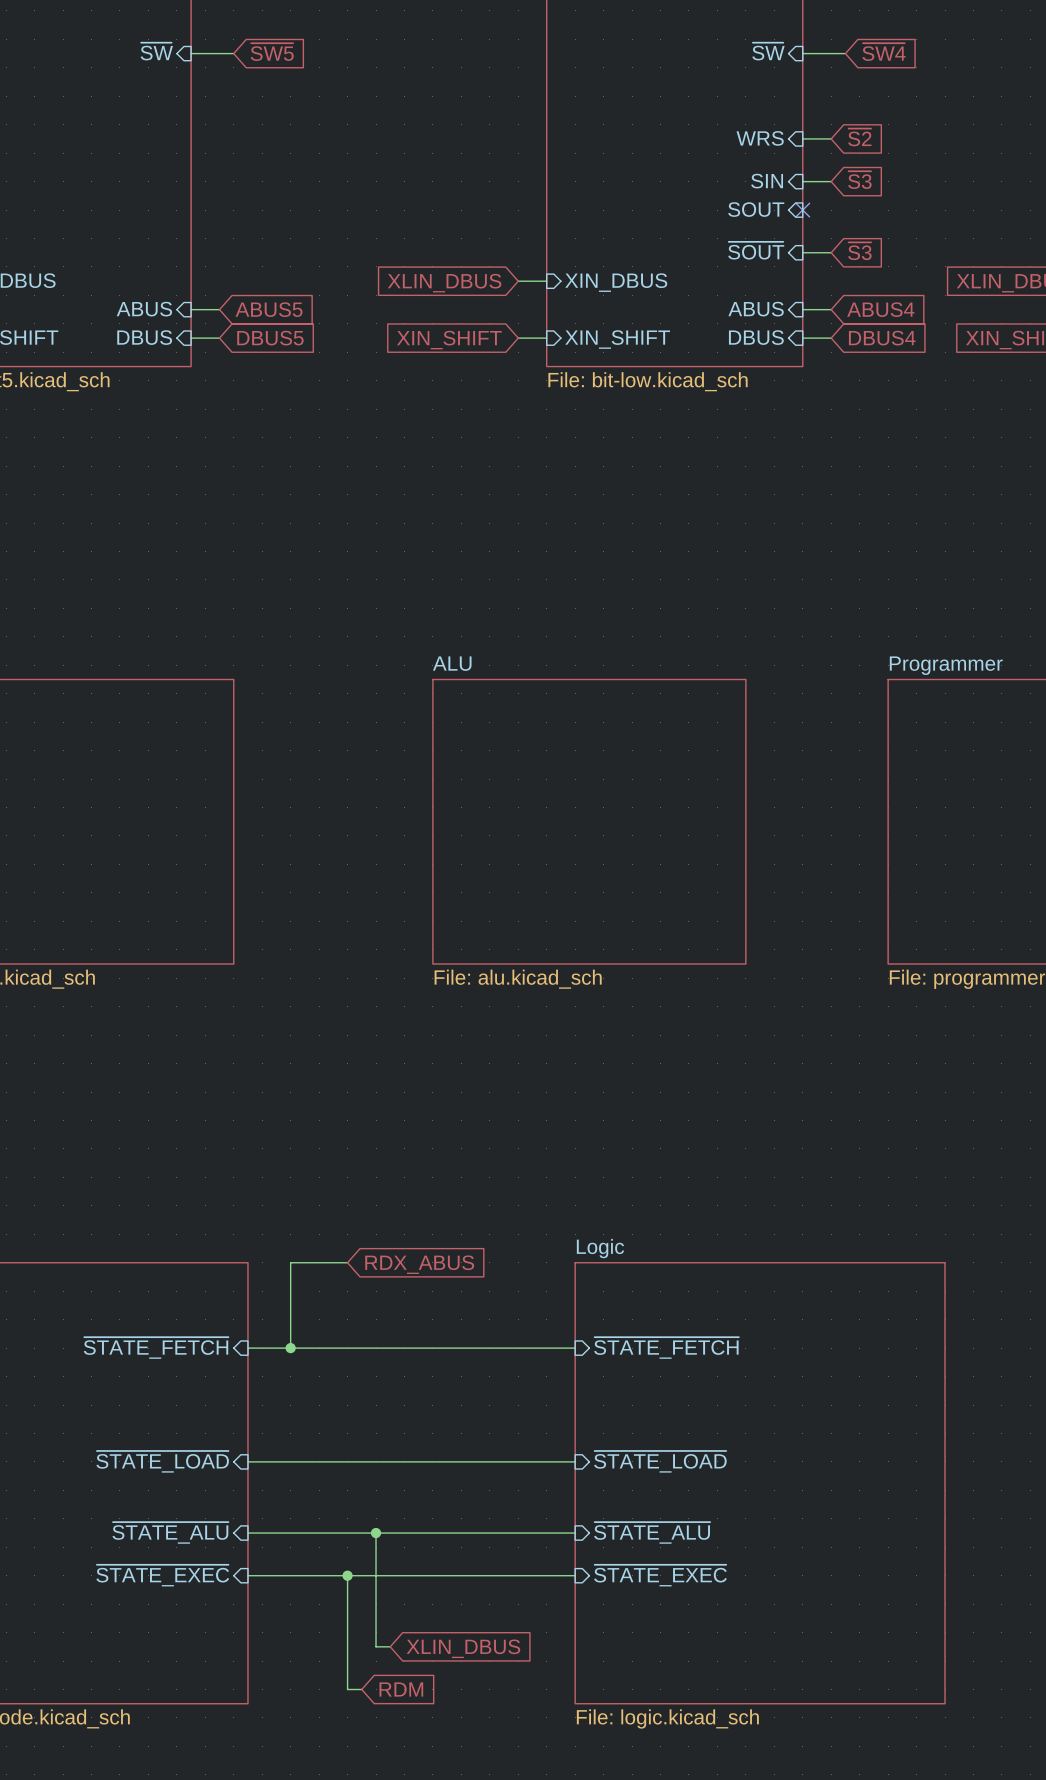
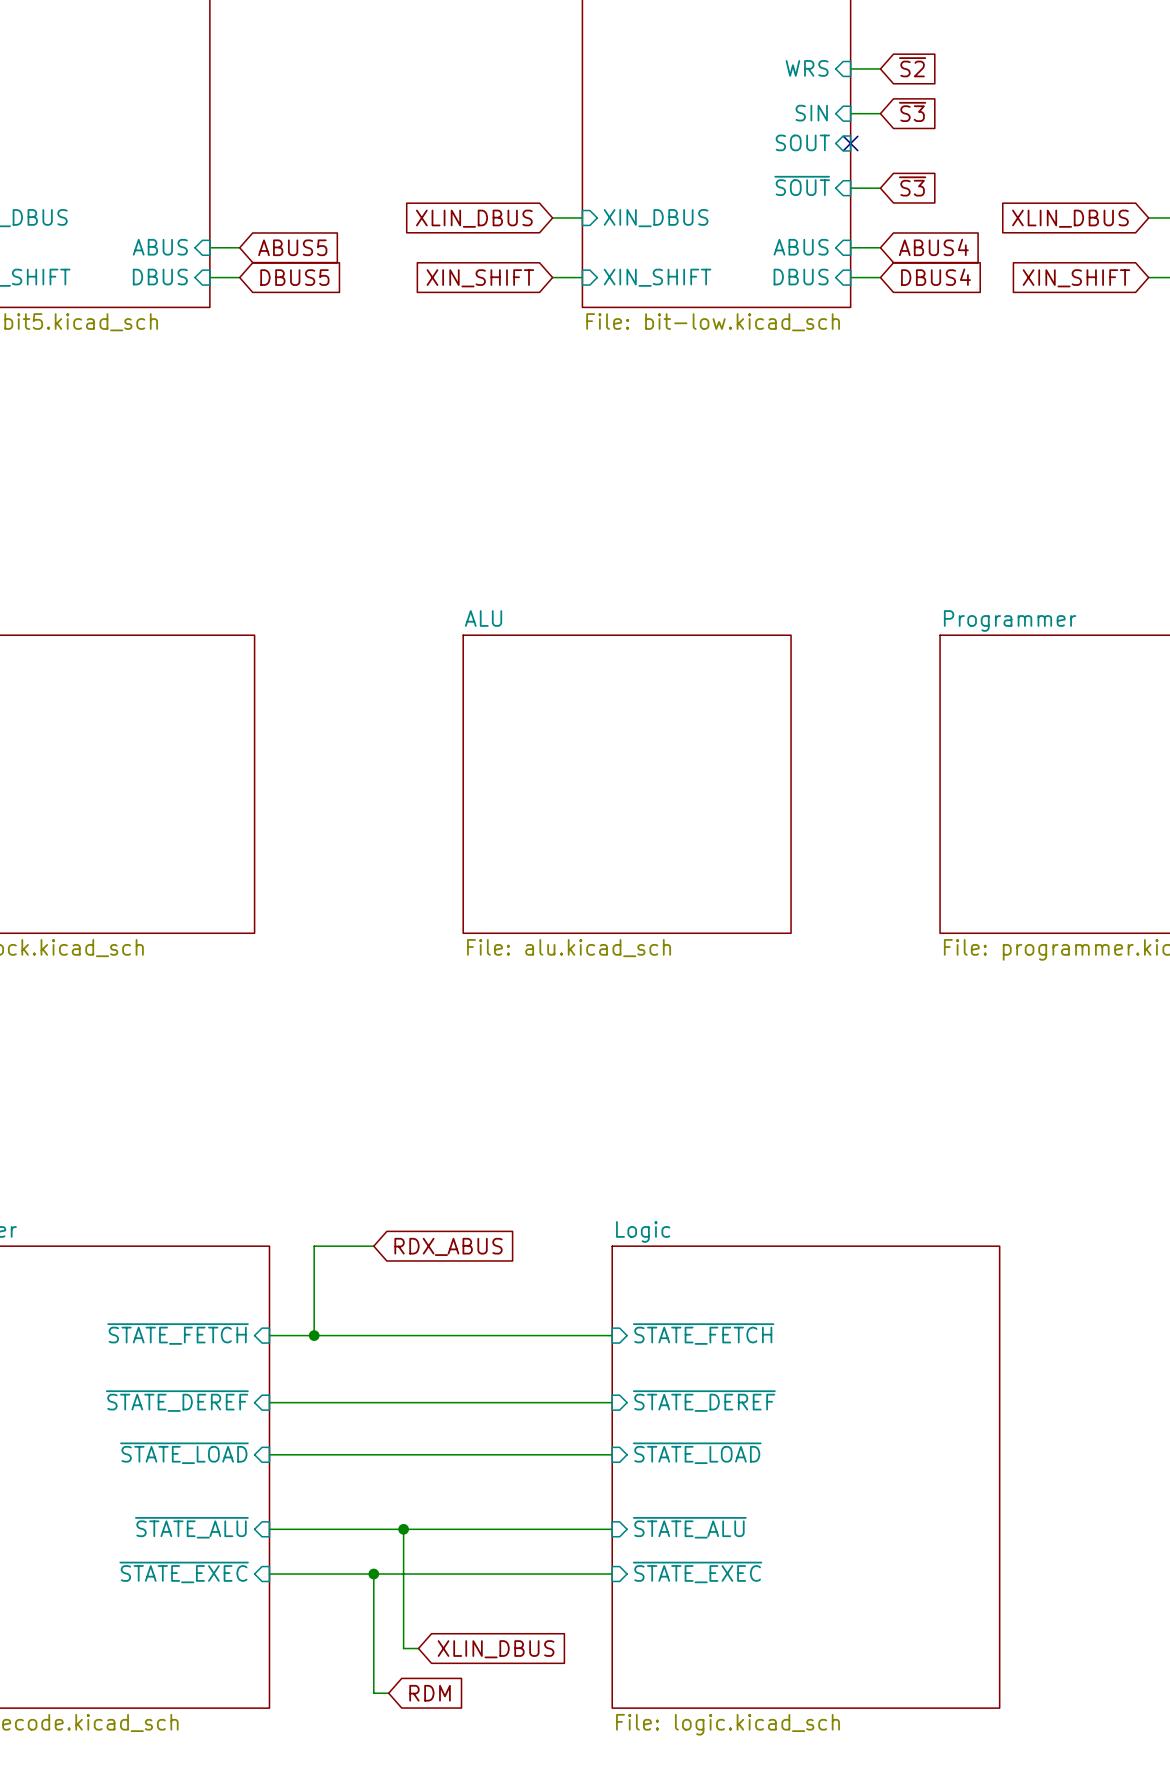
sheet pin: none -> ~{STATE_DEREF} (177, 1401)
wire: none -> (269, 1402) (612, 1402)
sheet pin: none -> ~{STATE_DEREF} (704, 1401)

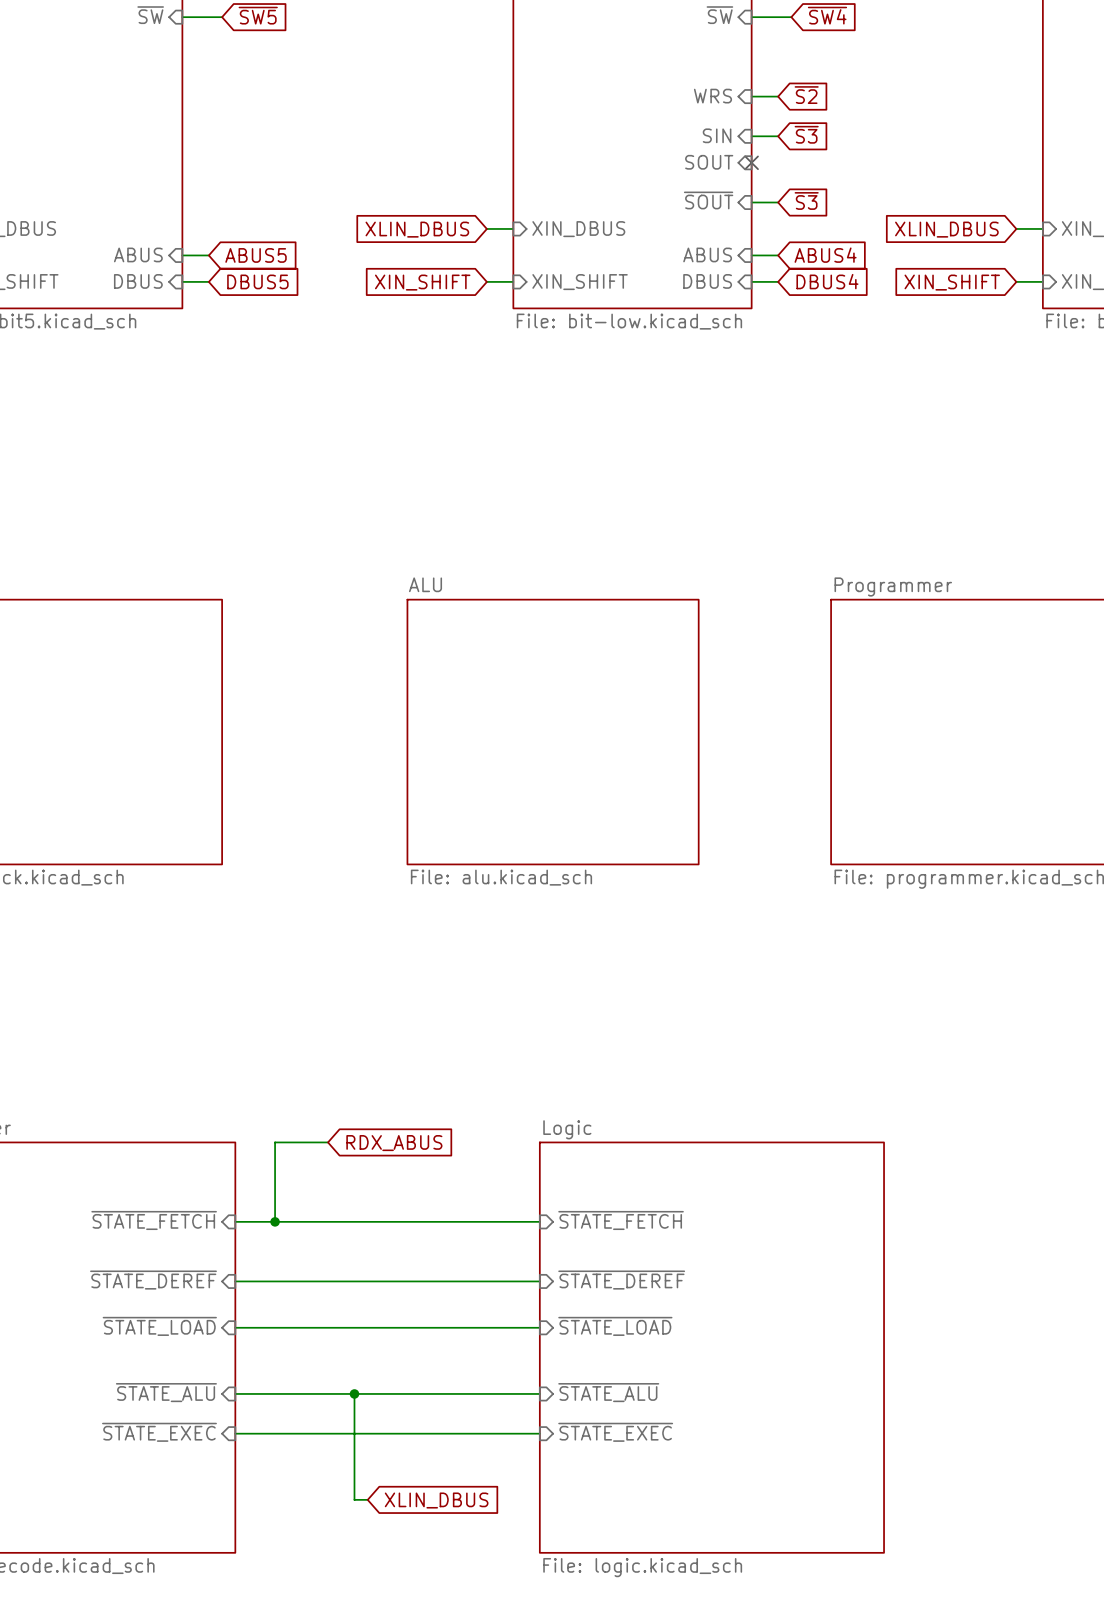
wire: (373, 1574) (373, 1693) (388, 1693) -> none
junction: (373, 1574) -> none
global label: RDM (430, 1693) -> none

